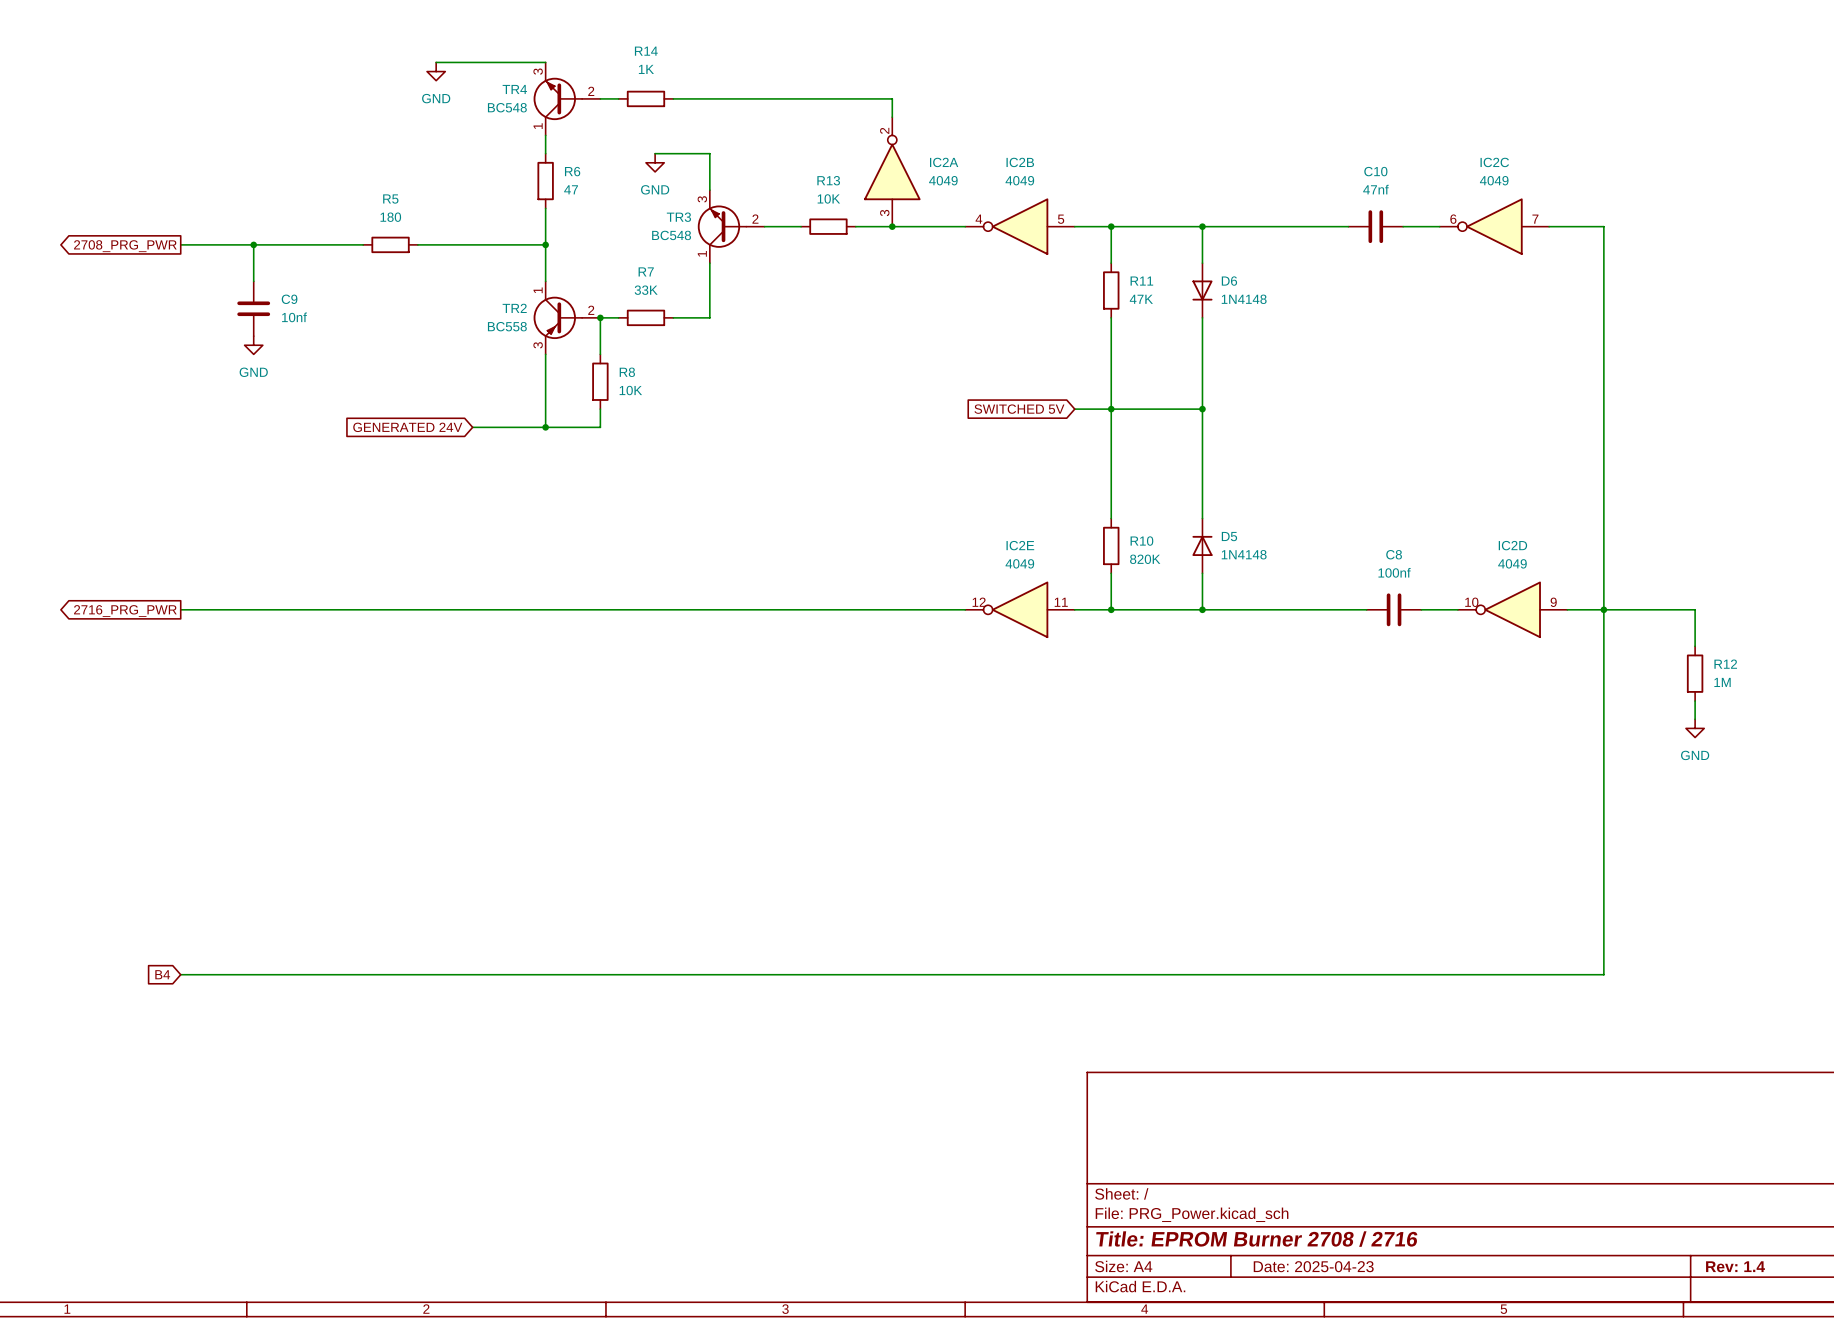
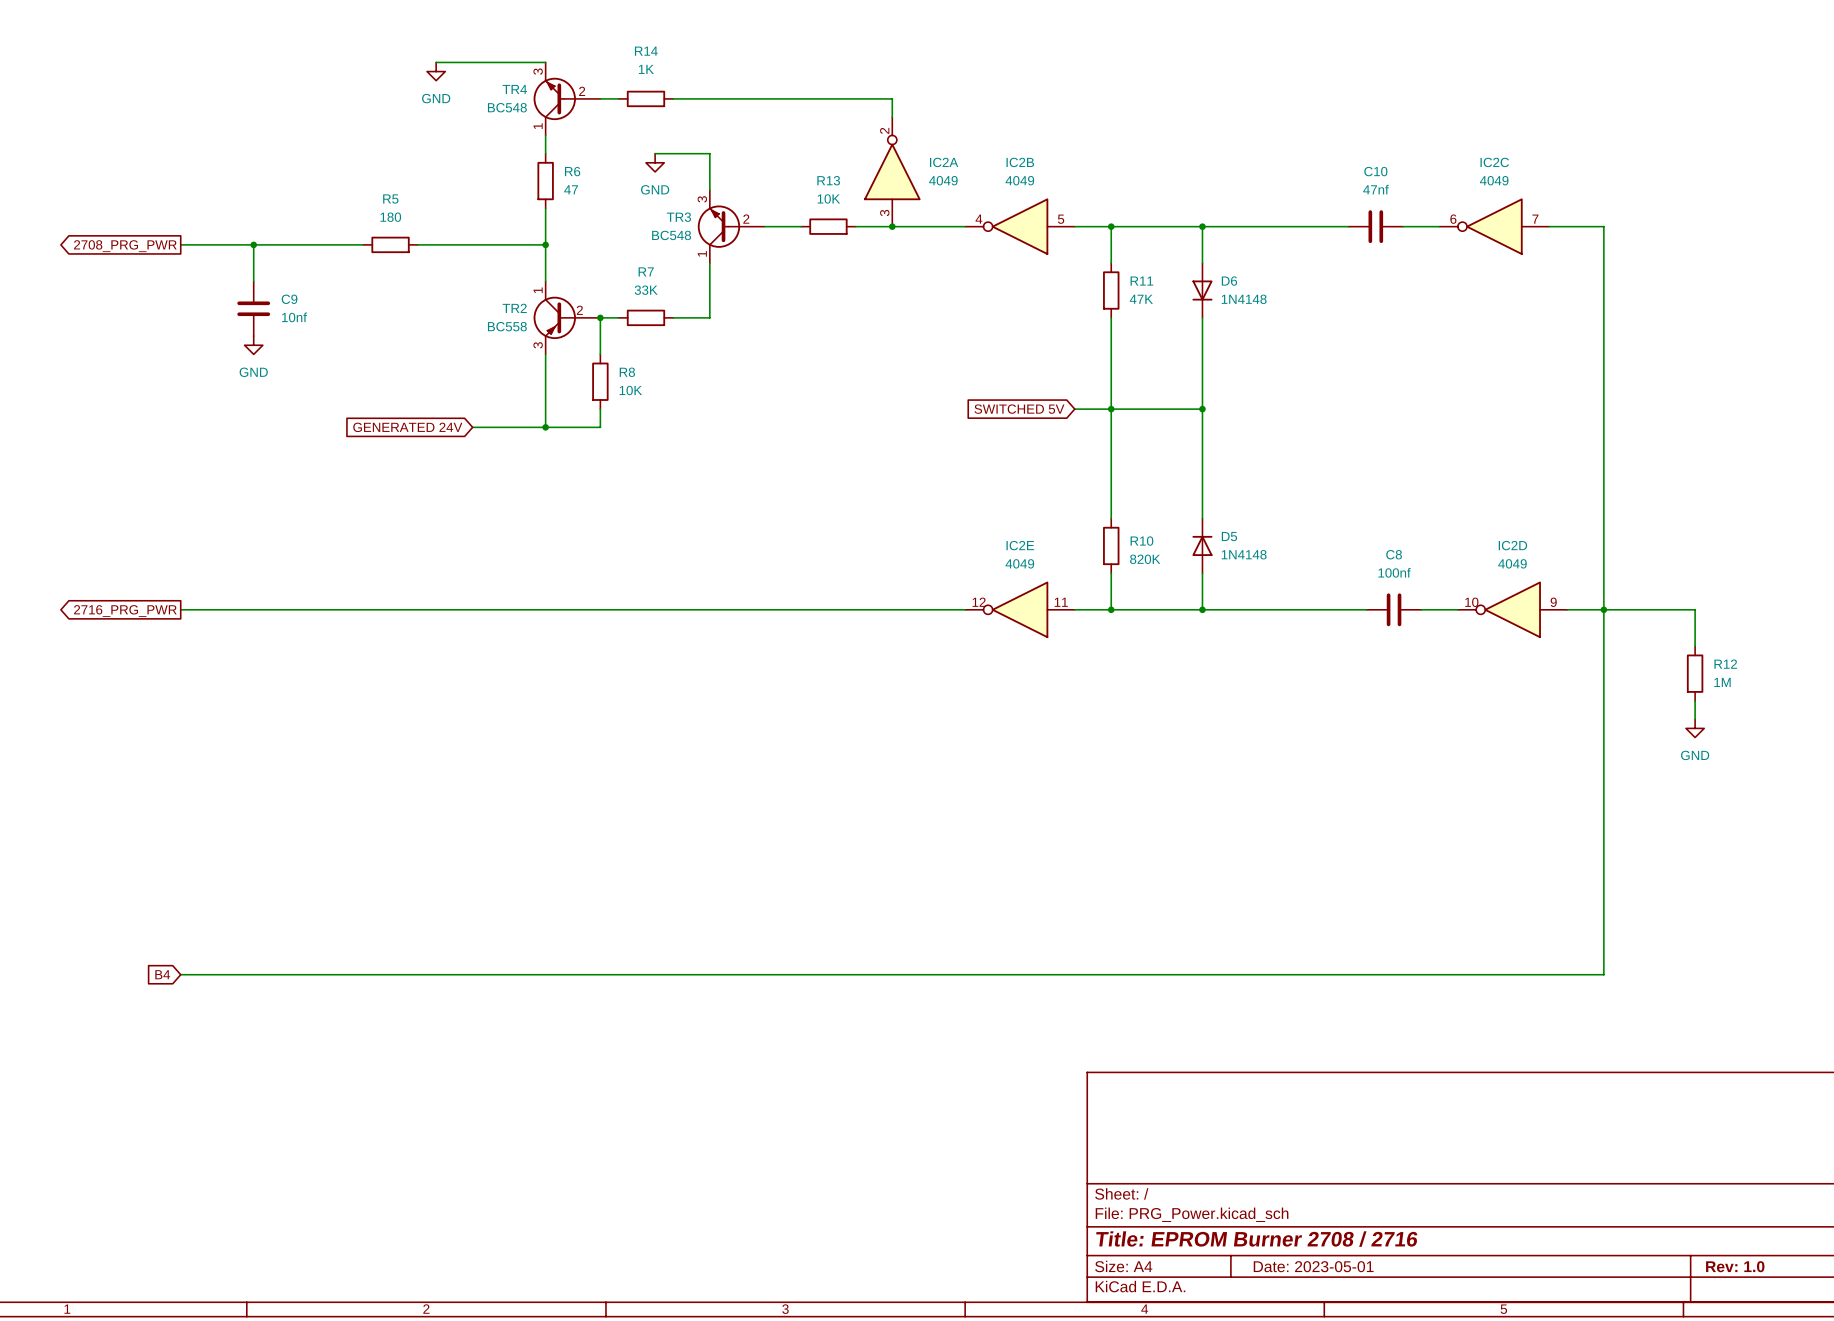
TR4 symbol: [533, 62, 601, 136] -> [533, 62, 601, 136]
TR3 symbol: [697, 190, 765, 264] -> [697, 190, 765, 264]
TR2 symbol: [533, 281, 601, 355] -> [533, 281, 601, 355]
title block: Date: 2025-04-23 (1313, 1266) -> Date: 2023-05-01 (1313, 1266)
title block: Rev: 1.4 (1735, 1266) -> Rev: 1.0 (1735, 1266)

